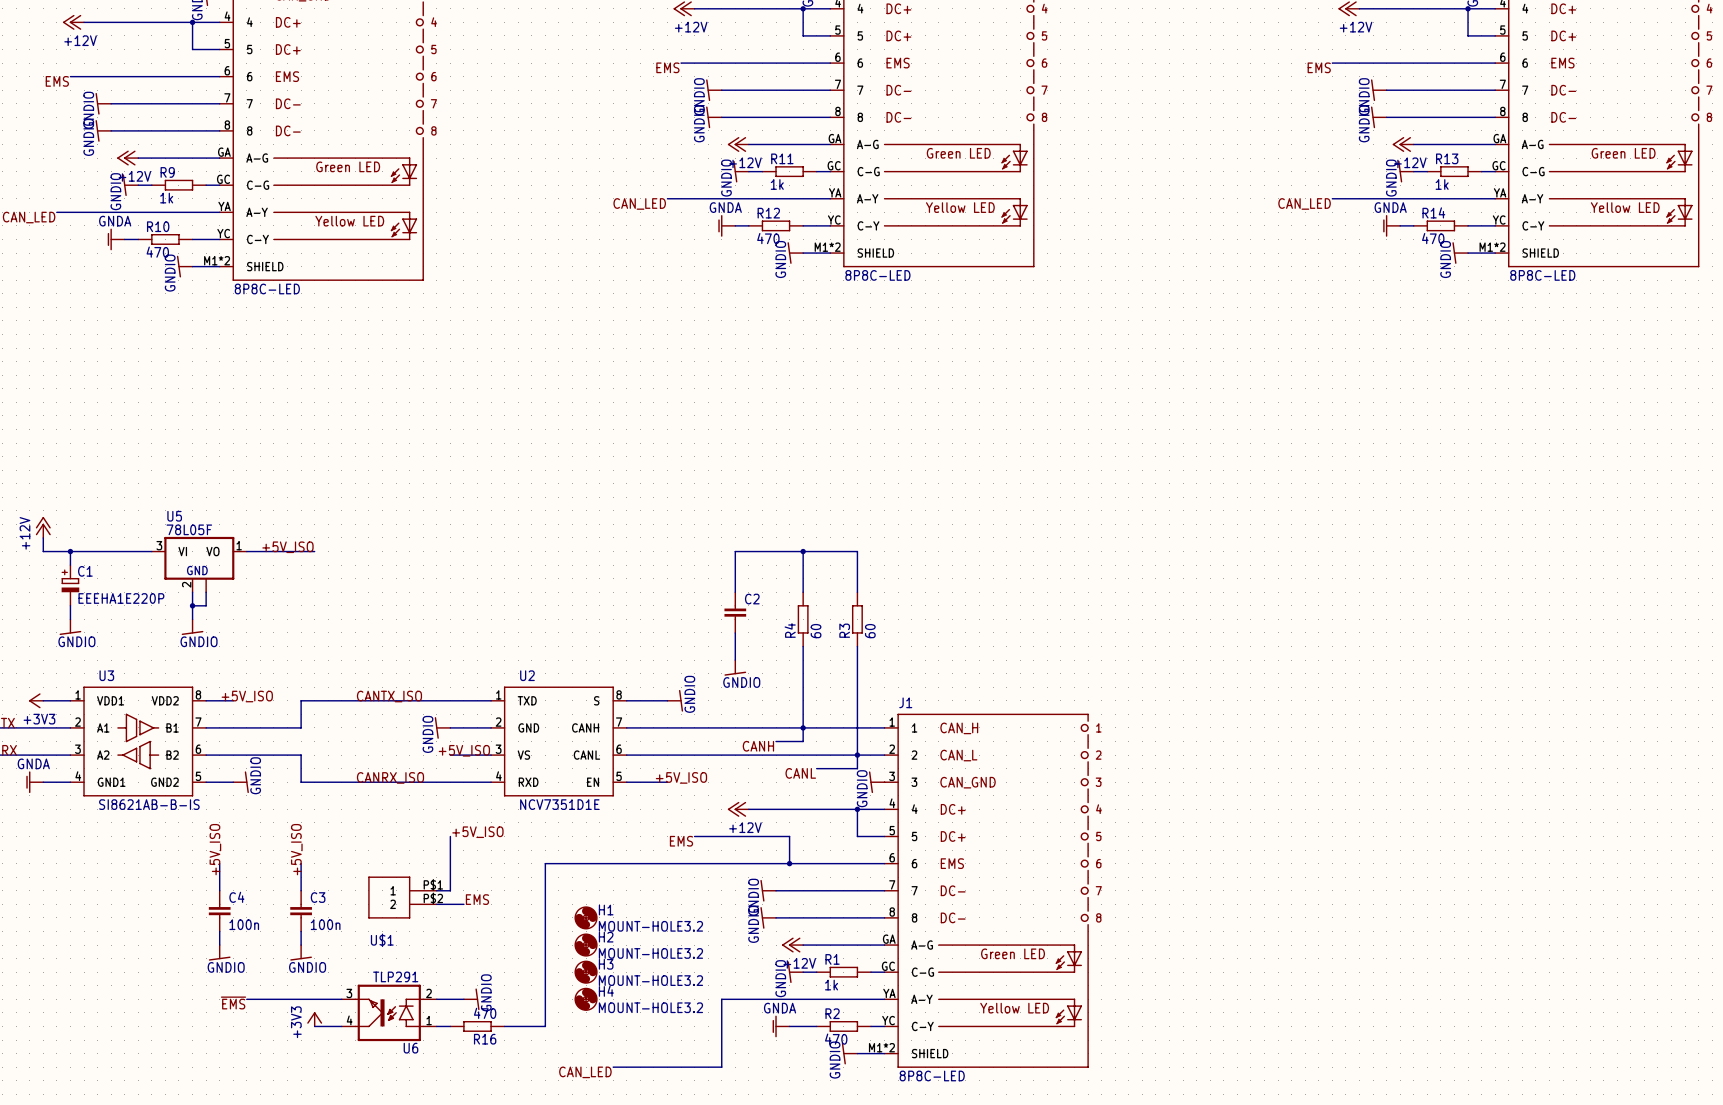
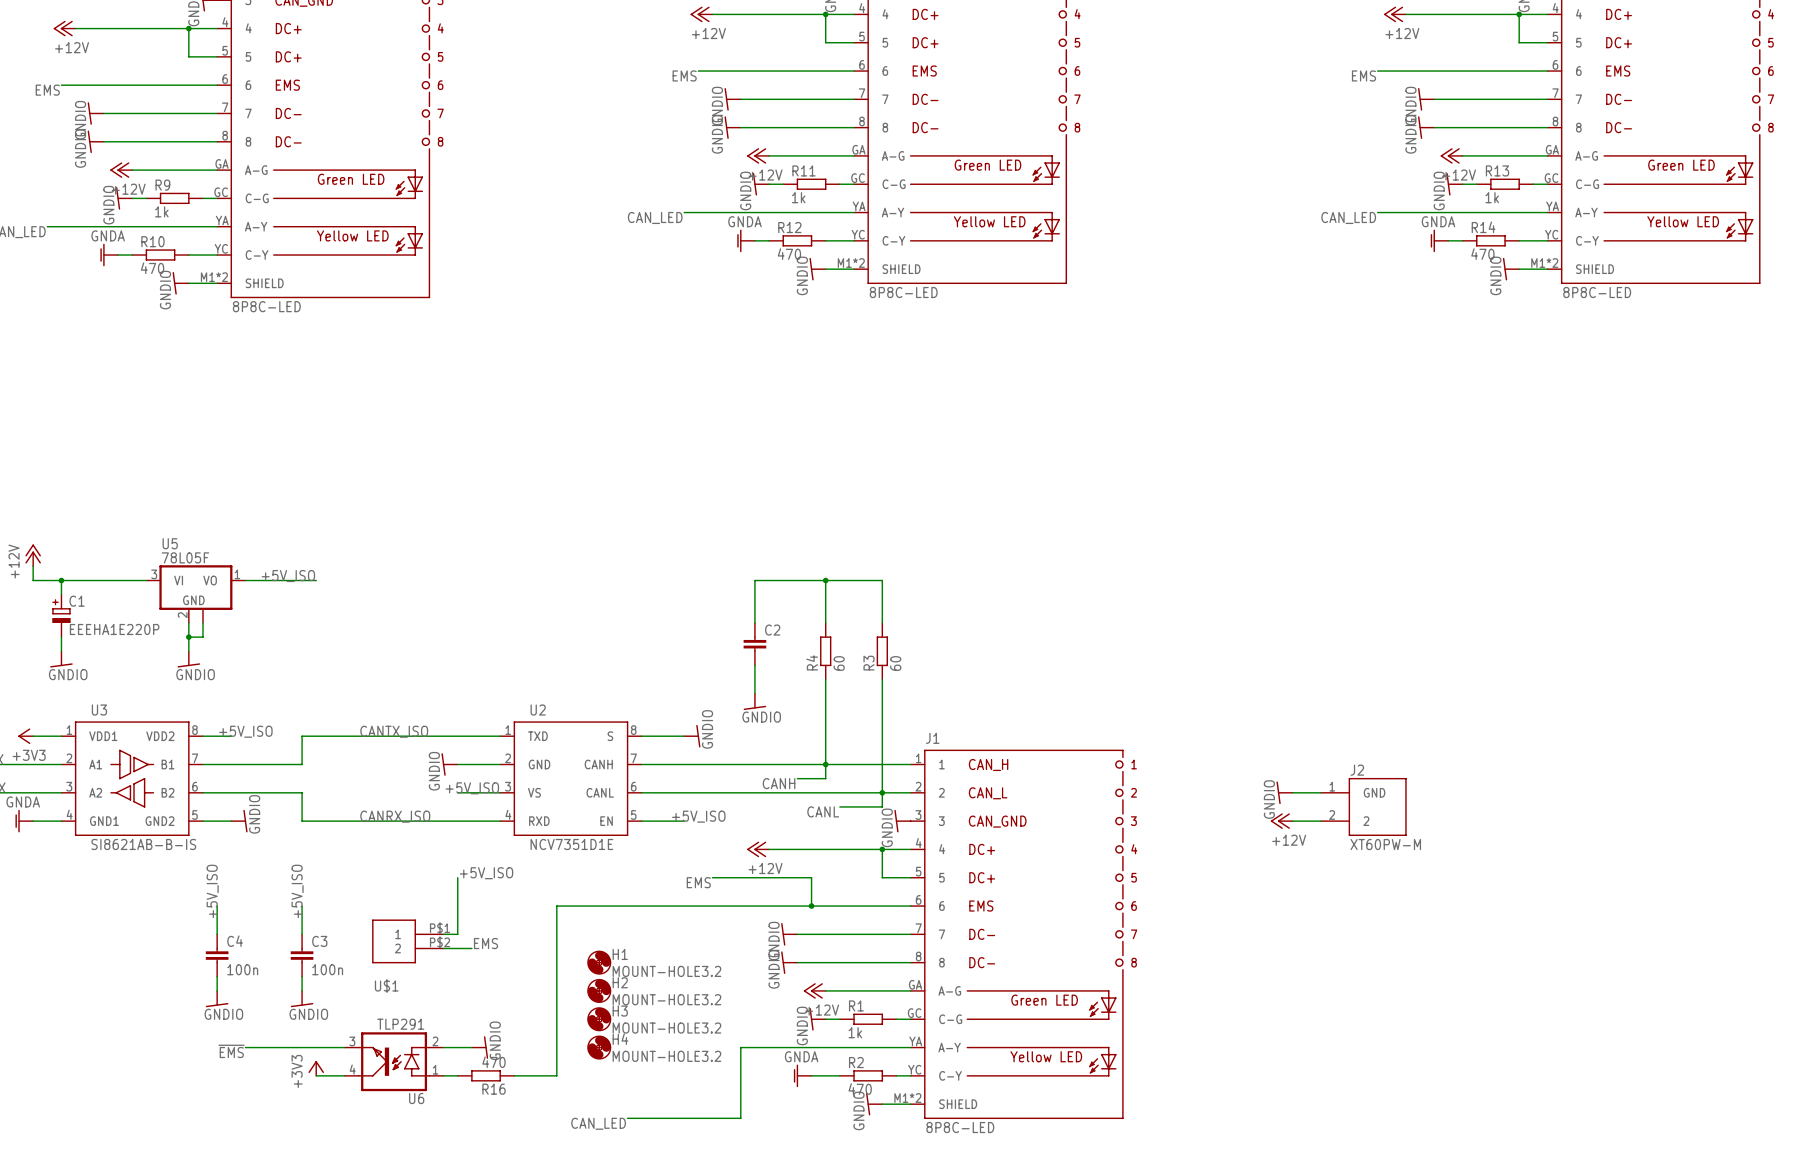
power symbol: none -> GNDIO (1284, 792)
wire: none -> (1292, 792) (1321, 792)
J2: none -> XT60PW-M (1363, 806)
power symbol: none -> +12V (1281, 821)
wire: none -> (1292, 821) (1321, 821)

